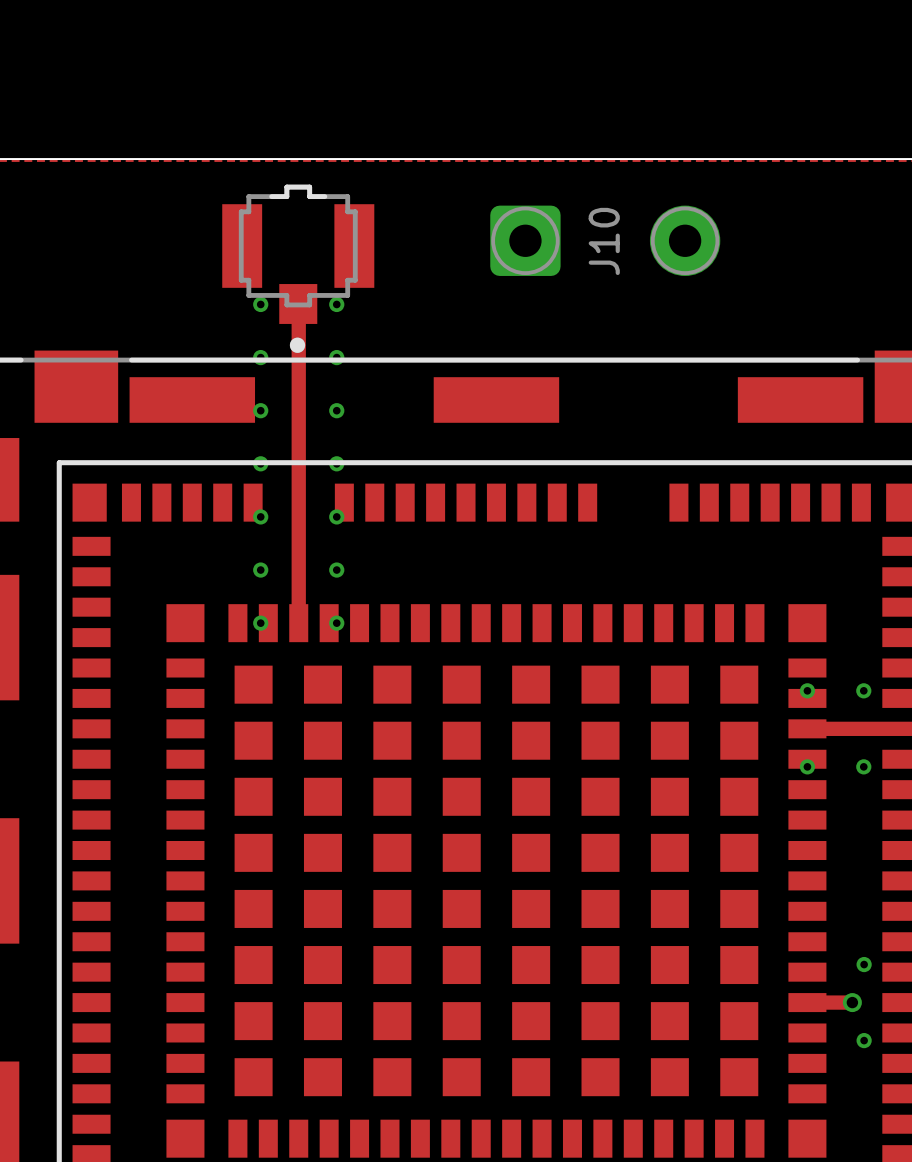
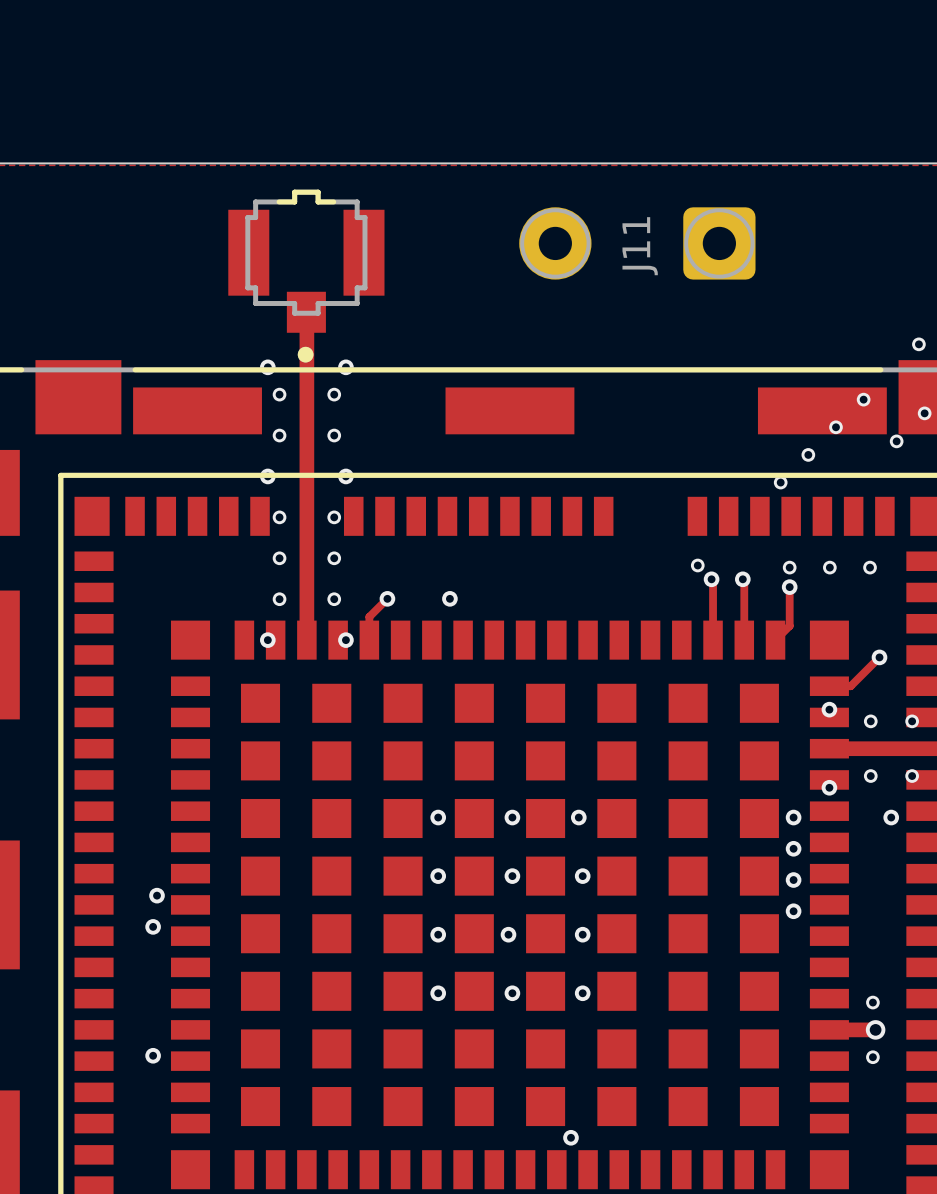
J11: none -> (637, 243)
J10: (605, 240) -> none
via: (260, 304) -> none
via: (336, 304) -> none
via: none -> (918, 344)
via: none -> (279, 394)
via: none -> (334, 394)
via: none -> (863, 399)
via: none -> (924, 413)
via position: (260, 410) -> (279, 435)
via position: (336, 410) -> (334, 435)
via: none -> (835, 427)
via: none -> (896, 441)
via: none -> (808, 454)
via: none -> (780, 482)
via position: (260, 516) -> (279, 517)
via position: (336, 516) -> (334, 517)
via: none -> (279, 558)
via: none -> (334, 558)
via: none -> (697, 565)
via: none -> (789, 567)
via: none -> (829, 567)
via: none -> (870, 567)
track: none -> (711, 579) (713, 640)
via: none -> (711, 579)
track: none -> (742, 579) (744, 640)
via: none -> (742, 579)
via position: (260, 570) -> (279, 599)
via position: (336, 570) -> (334, 599)
track: none -> (789, 587) (789, 625) (775, 640)
via: none -> (789, 587)
track: none -> (387, 598) (369, 616) (369, 640)
via: none -> (387, 598)
via: none -> (449, 598)
track: none -> (879, 657) (850, 686) (829, 686)
via: none -> (879, 657)
via: (863, 690) -> none
via: none -> (870, 721)
via: none -> (912, 721)
via: none -> (870, 776)
via: none -> (912, 776)
via position: (863, 766) -> (891, 817)
via: none -> (438, 817)
via: none -> (512, 817)
via: none -> (578, 817)
via: none -> (793, 817)
via: none -> (793, 848)
via: none -> (438, 876)
via: none -> (512, 876)
via: none -> (582, 876)
via: none -> (793, 880)
via: none -> (157, 895)
via: none -> (793, 911)
via: none -> (153, 926)
via: none -> (438, 934)
via: none -> (508, 934)
via: none -> (582, 934)
via: (864, 964) -> none
via: none -> (438, 993)
via: none -> (512, 993)
via: none -> (582, 993)
via: none -> (872, 1002)
via: none -> (153, 1055)
via: none -> (872, 1057)
via: (864, 1040) -> none
via: none -> (570, 1137)

